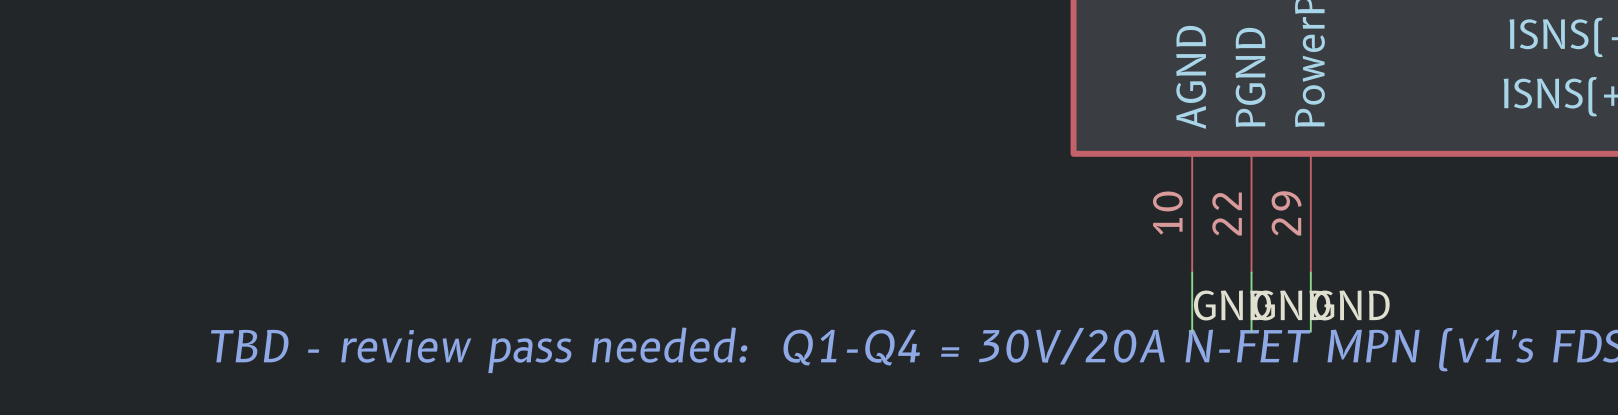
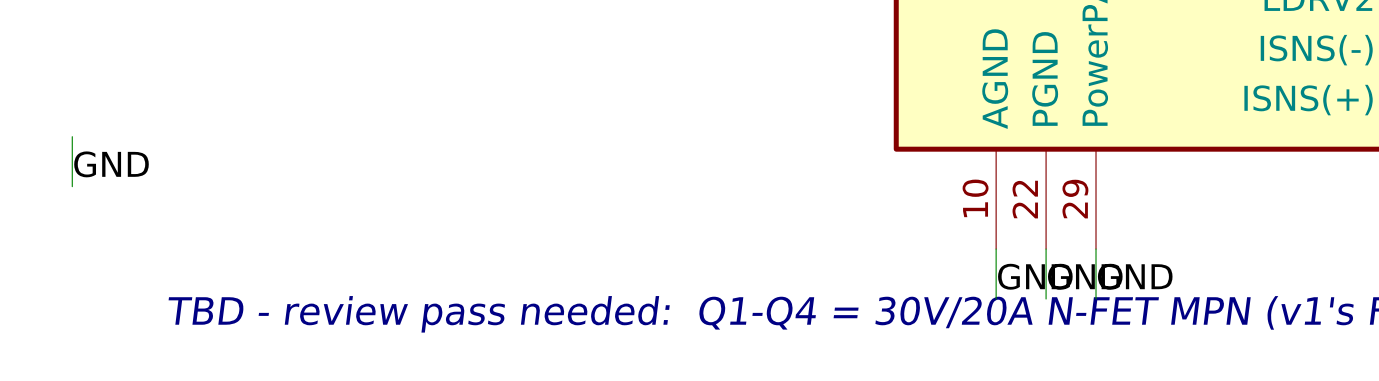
wire: none -> (72, 136) (72, 186)
label: none -> GND (111, 164)

